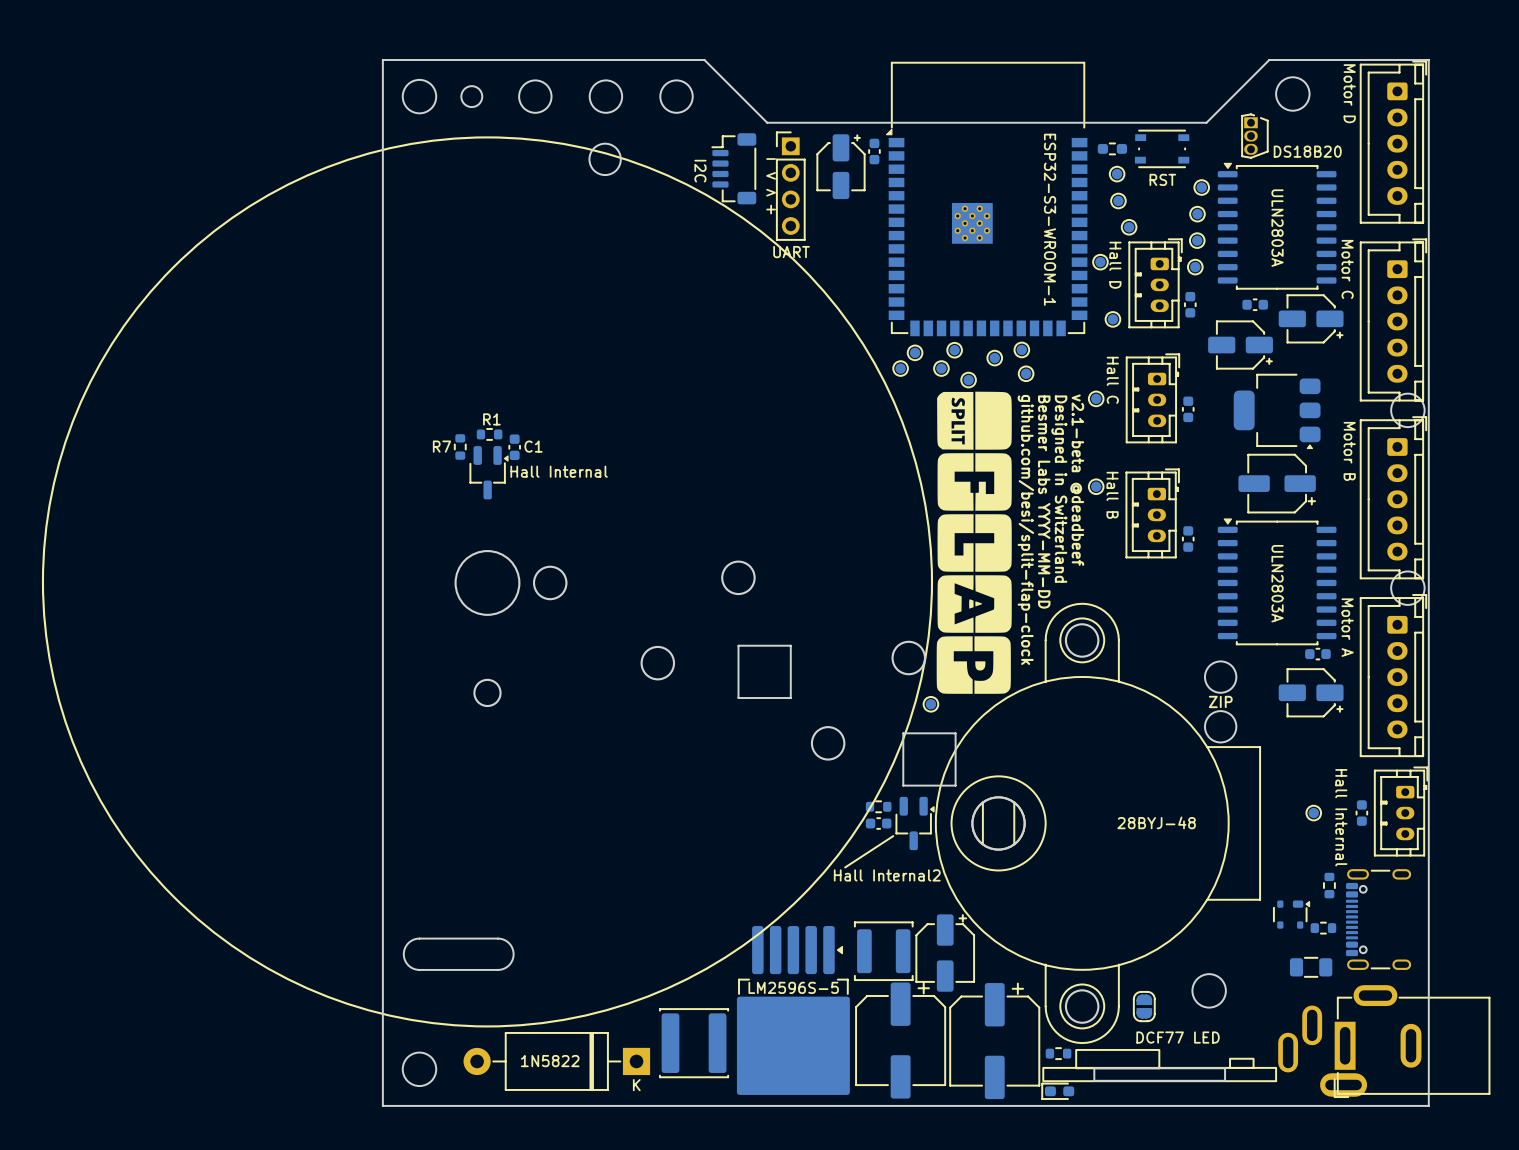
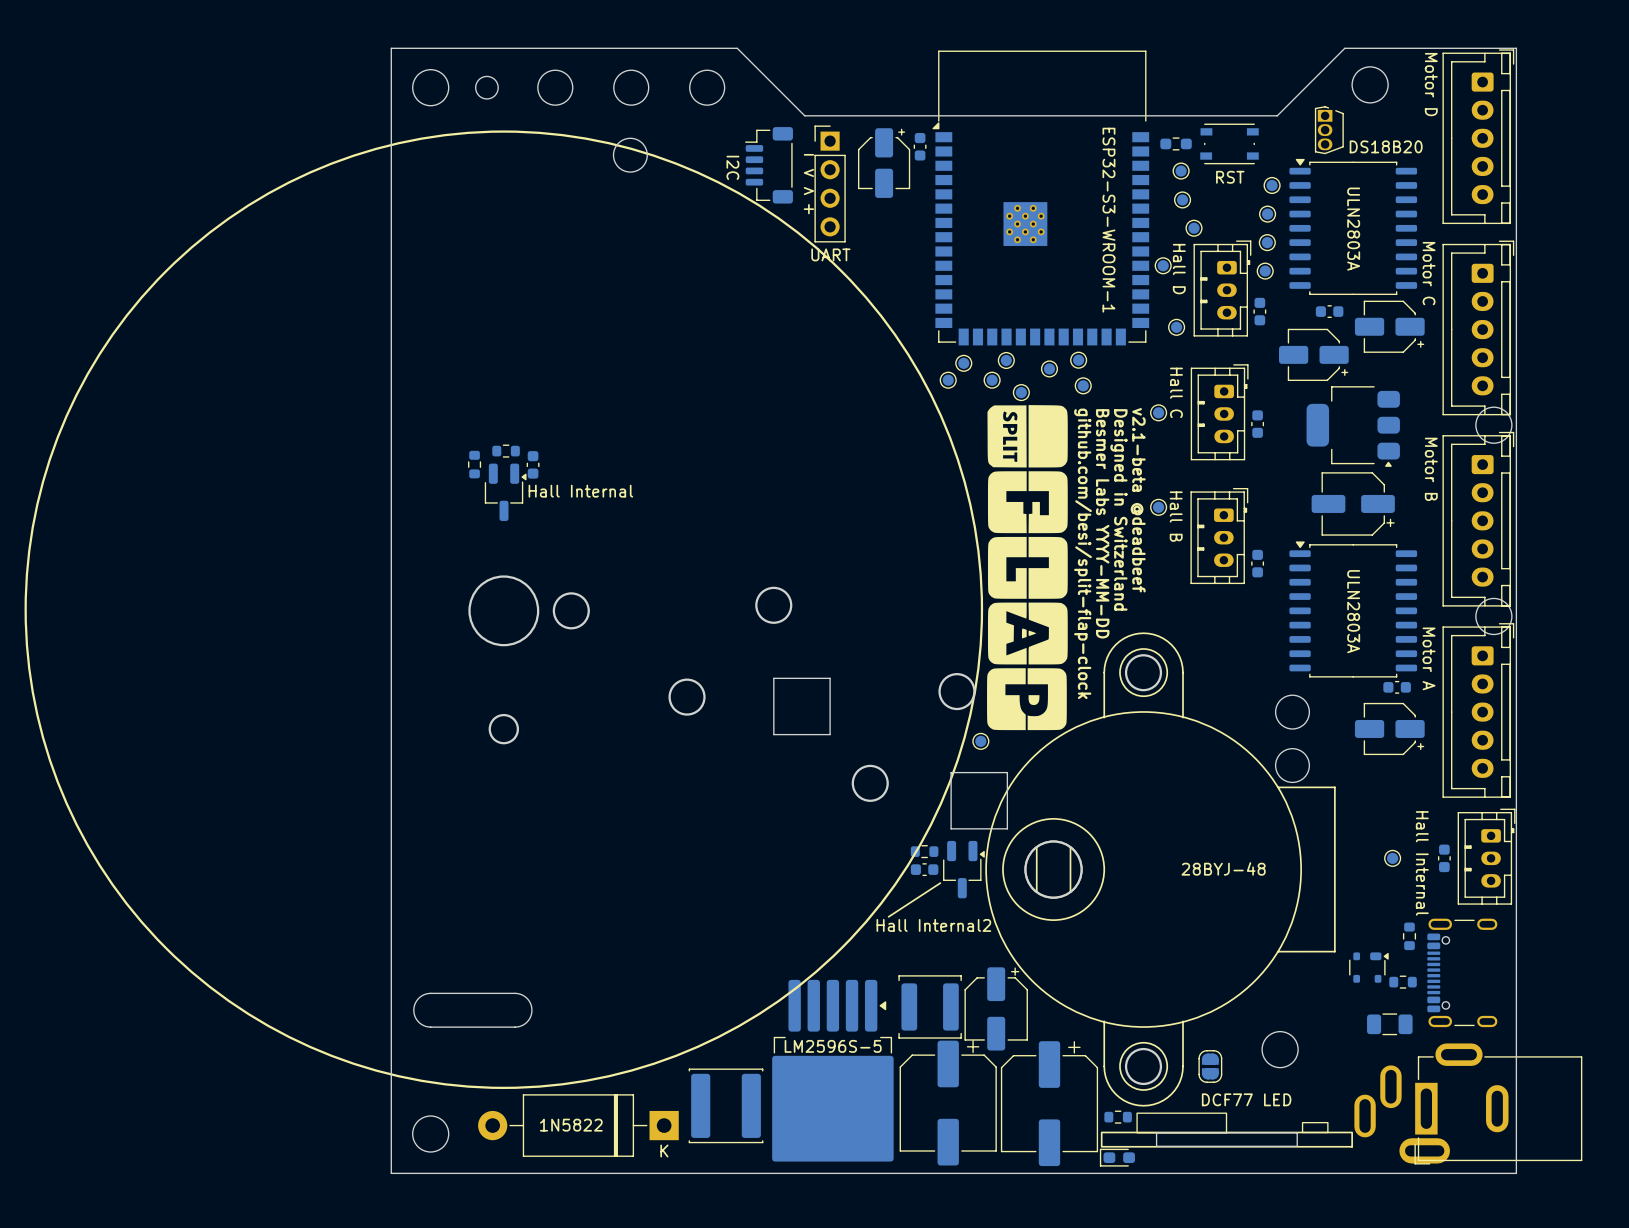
R1 name: R1 (491, 419) -> none
R7 name: R7 (441, 446) -> none
C1 name: C1 (533, 446) -> none
text: ZIP (1220, 701) -> none

